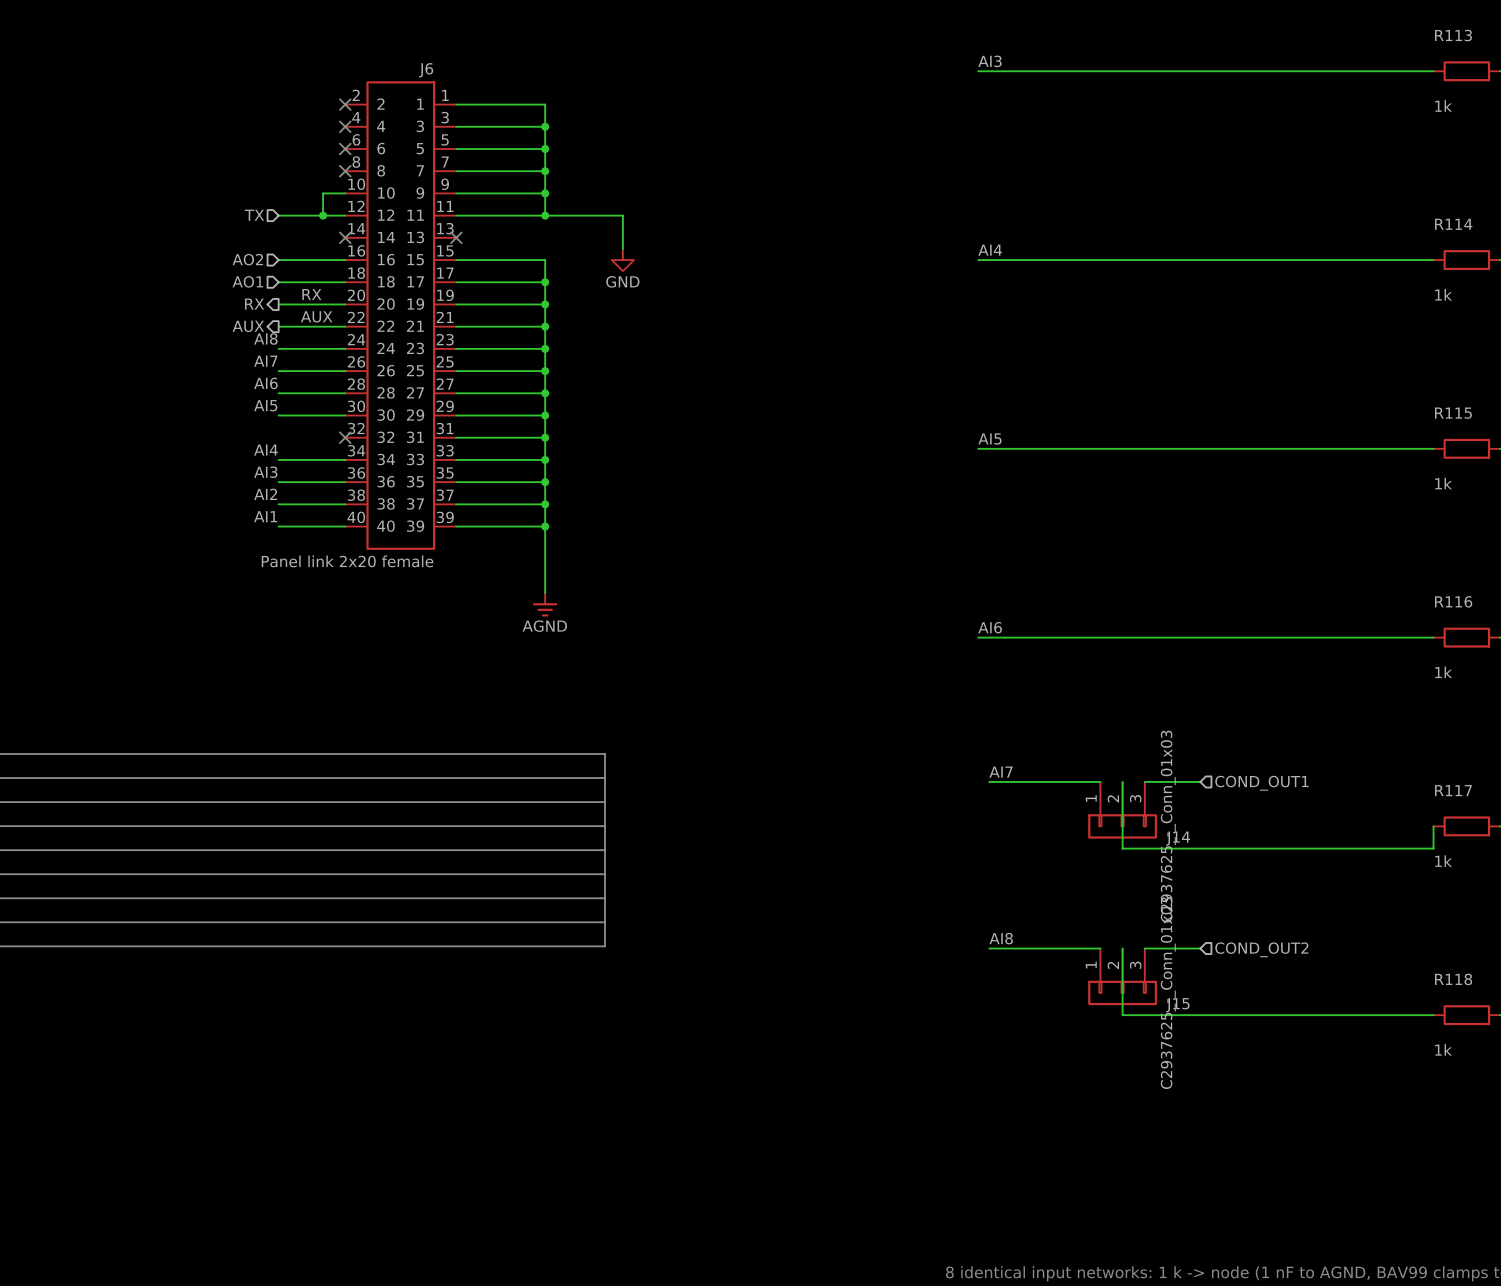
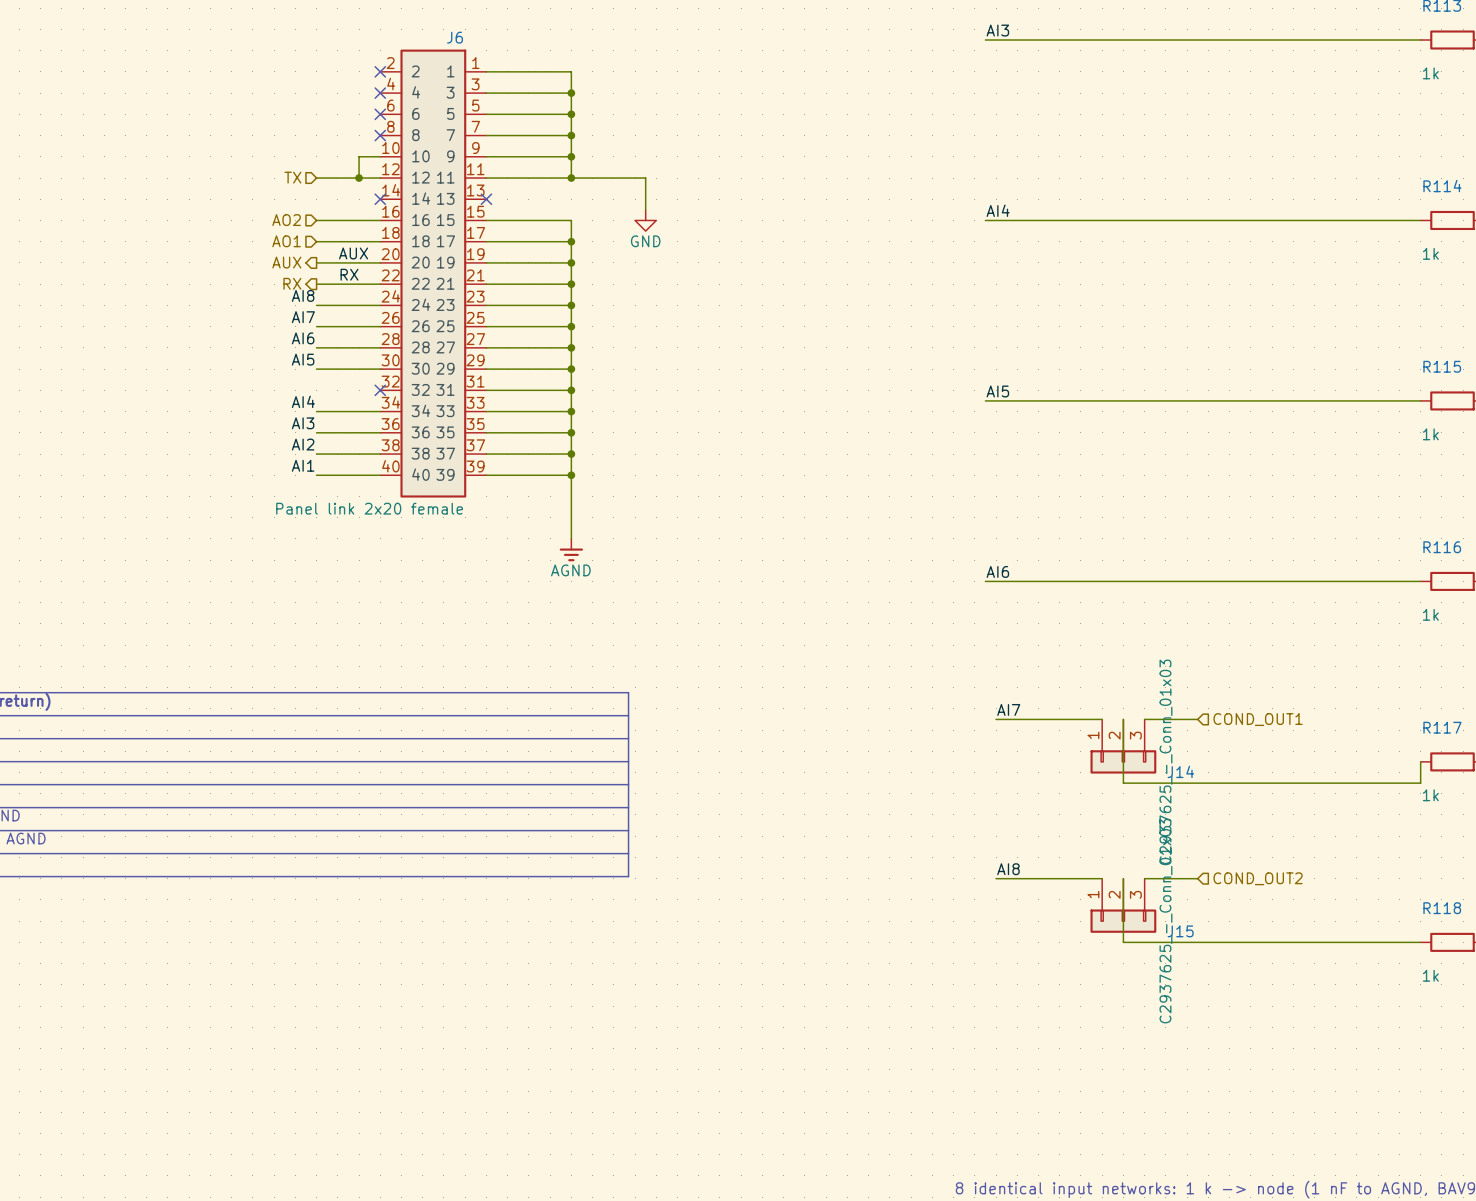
label: RX (311, 294) -> AUX (353, 253)
hierarchical label: RX (254, 304) -> AUX (286, 262)
label: AUX (316, 316) -> RX (349, 274)
hierarchical label: AUX (248, 326) -> RX (292, 283)

